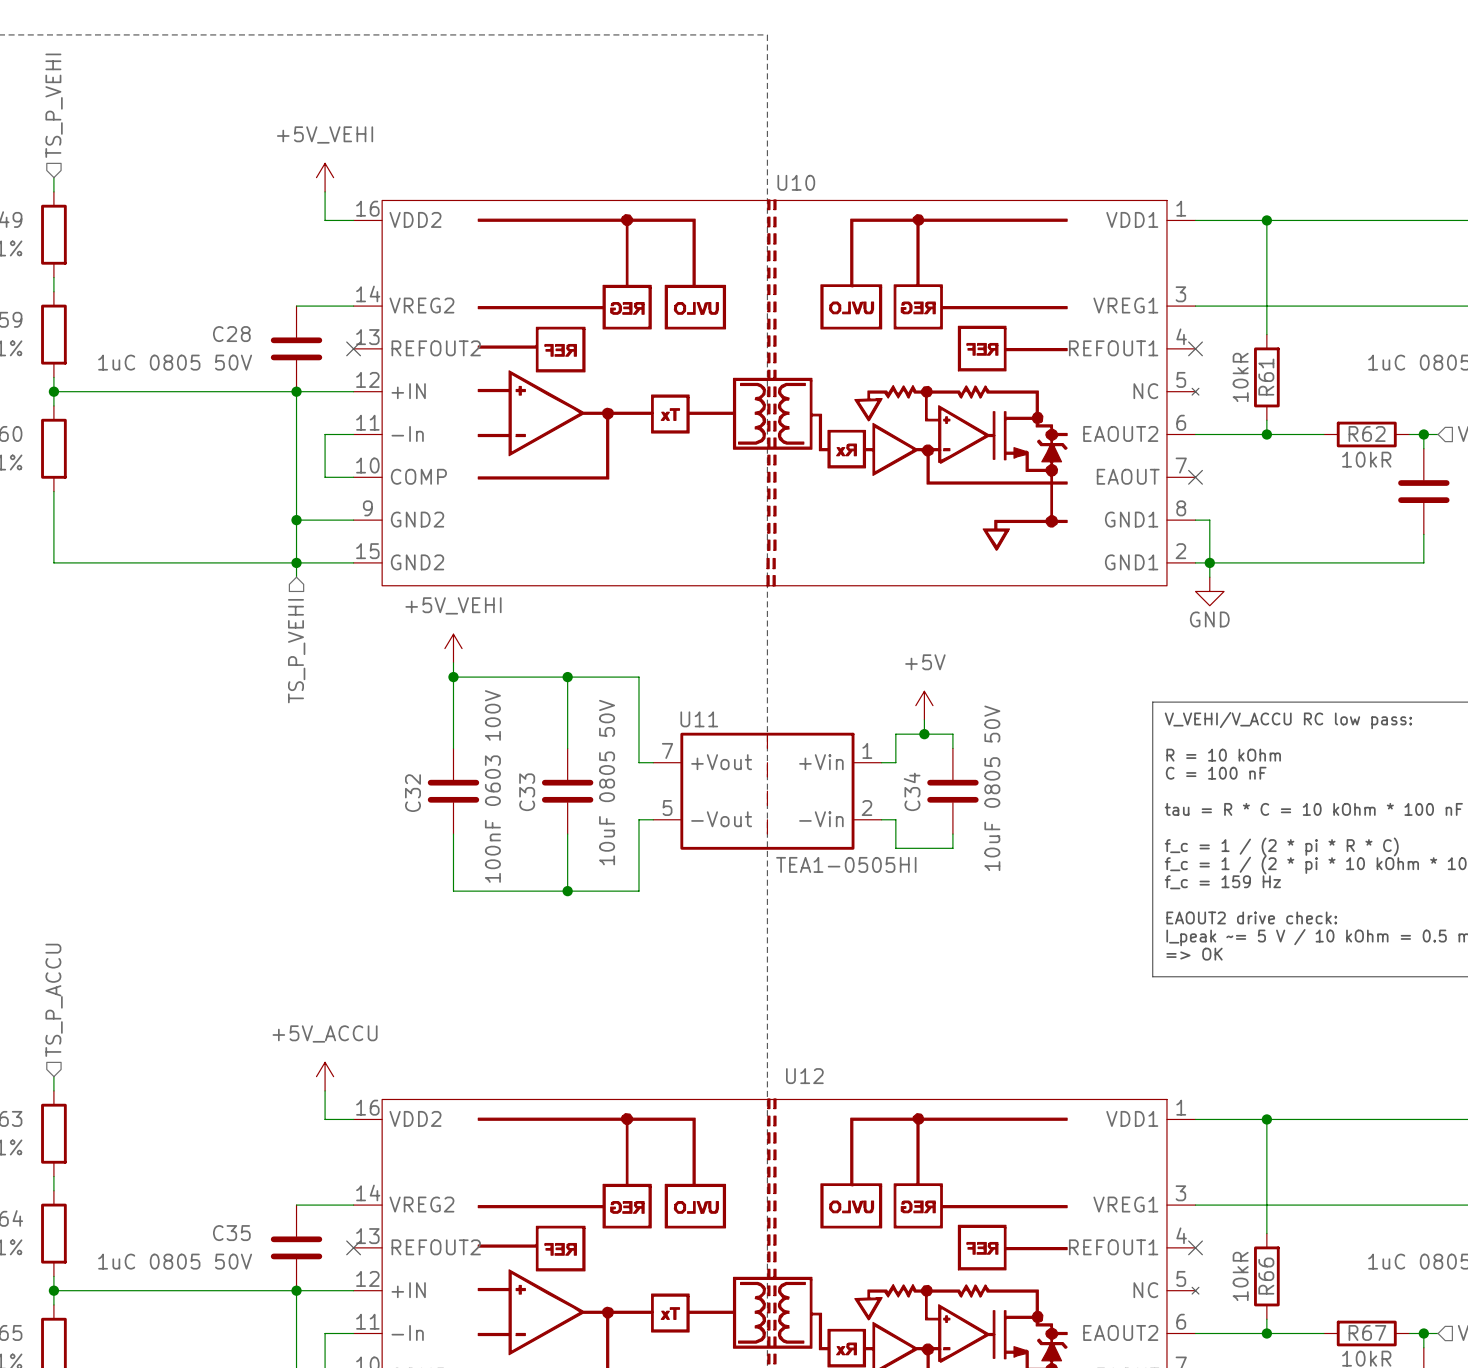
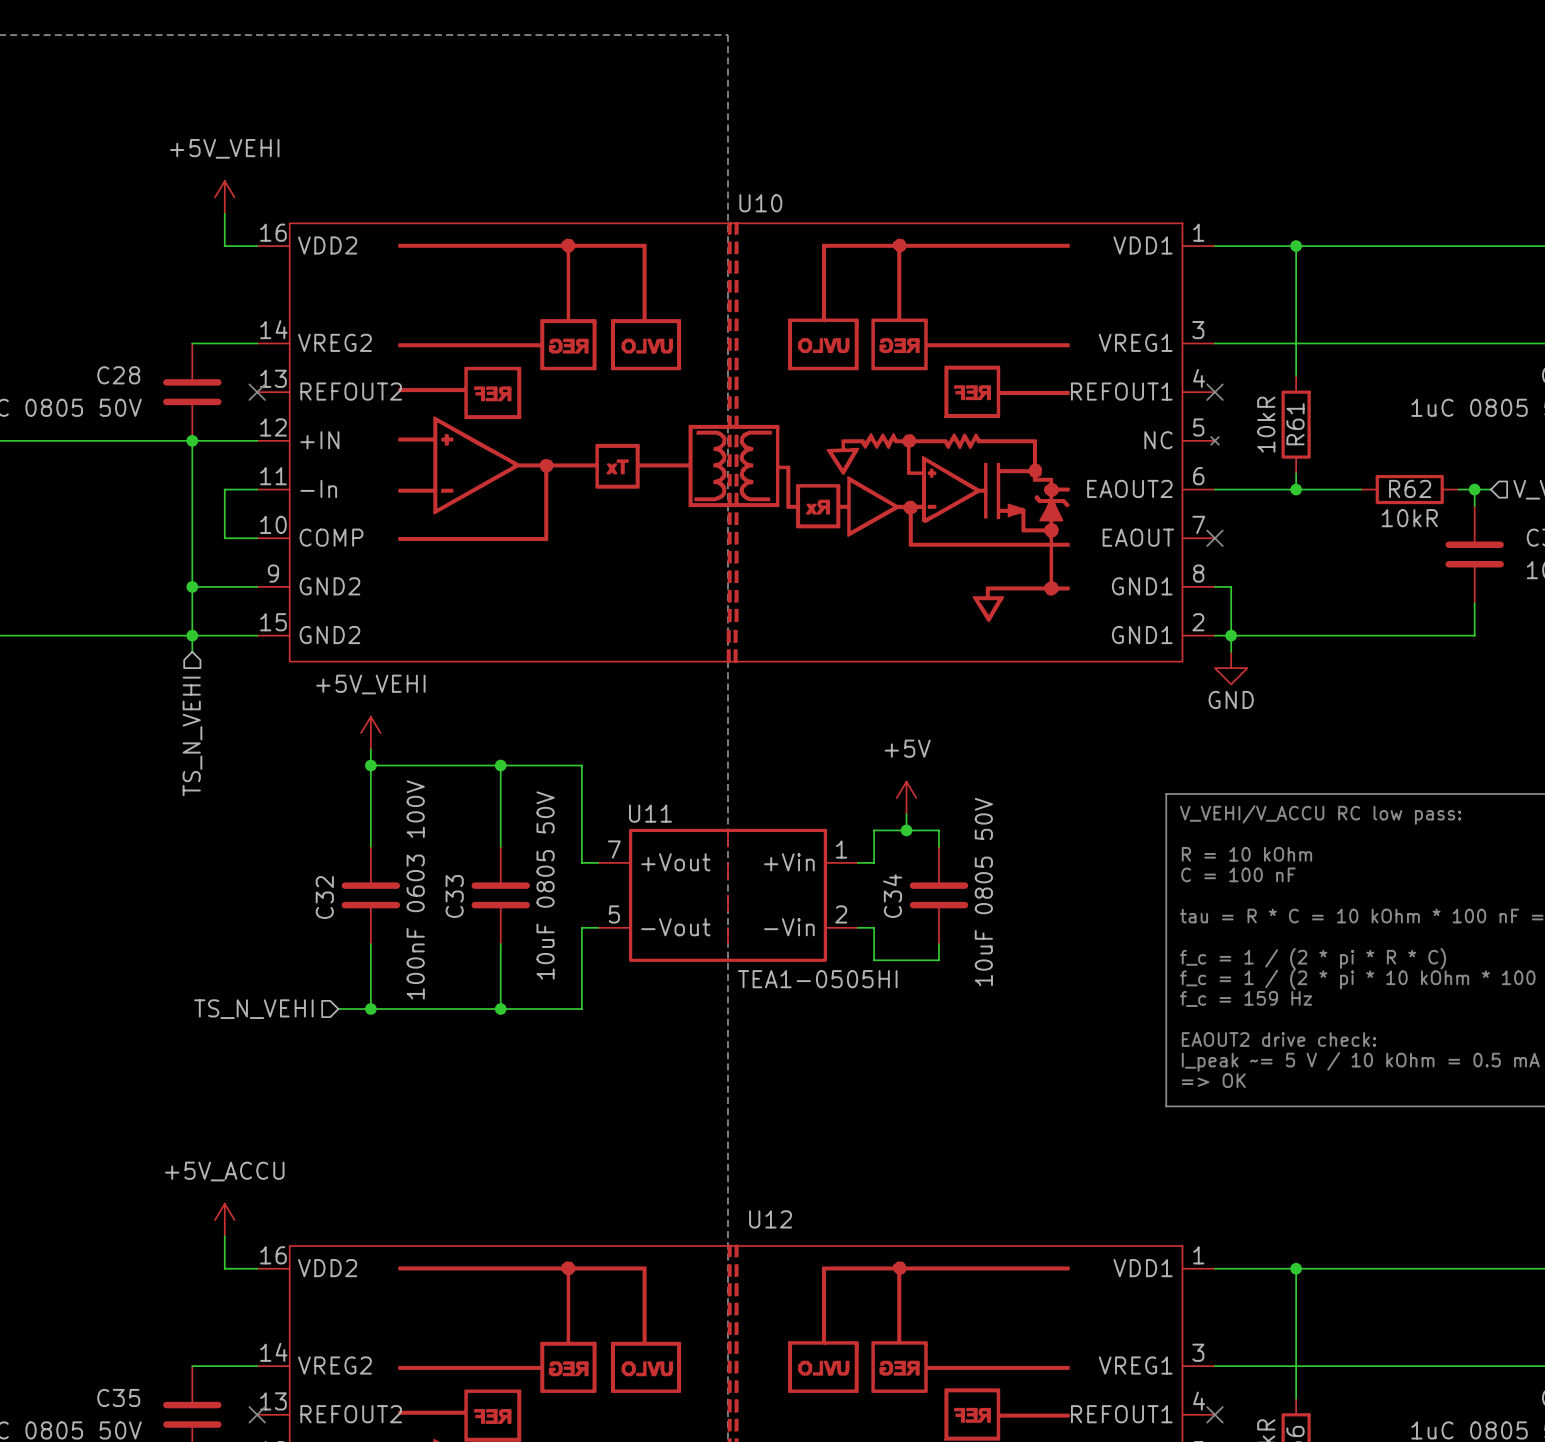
hierarchical label: TS_P_VEHI (296, 651) -> TS_N_VEHI (192, 736)
hierarchical label: none -> TS_N_VEHI (253, 1009)
wire: none -> (338, 1009) (370, 1009)
junction: none -> (370, 1009)

